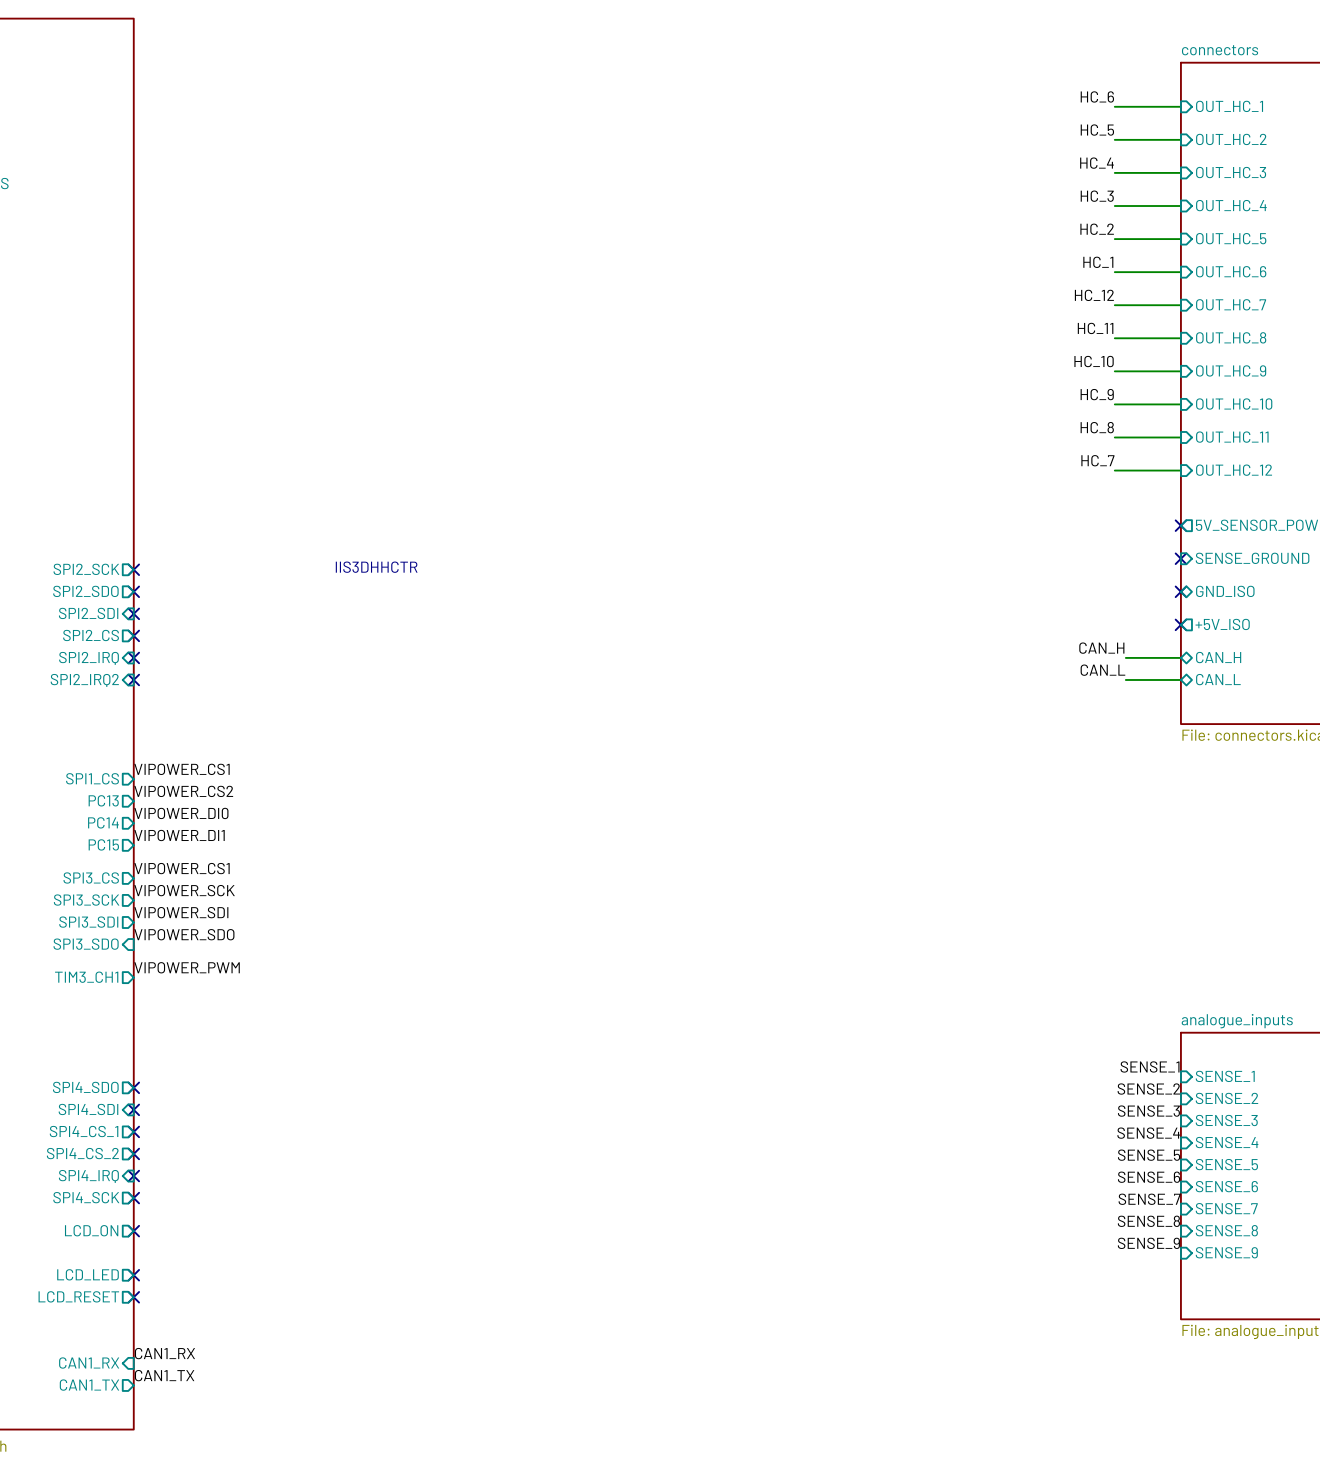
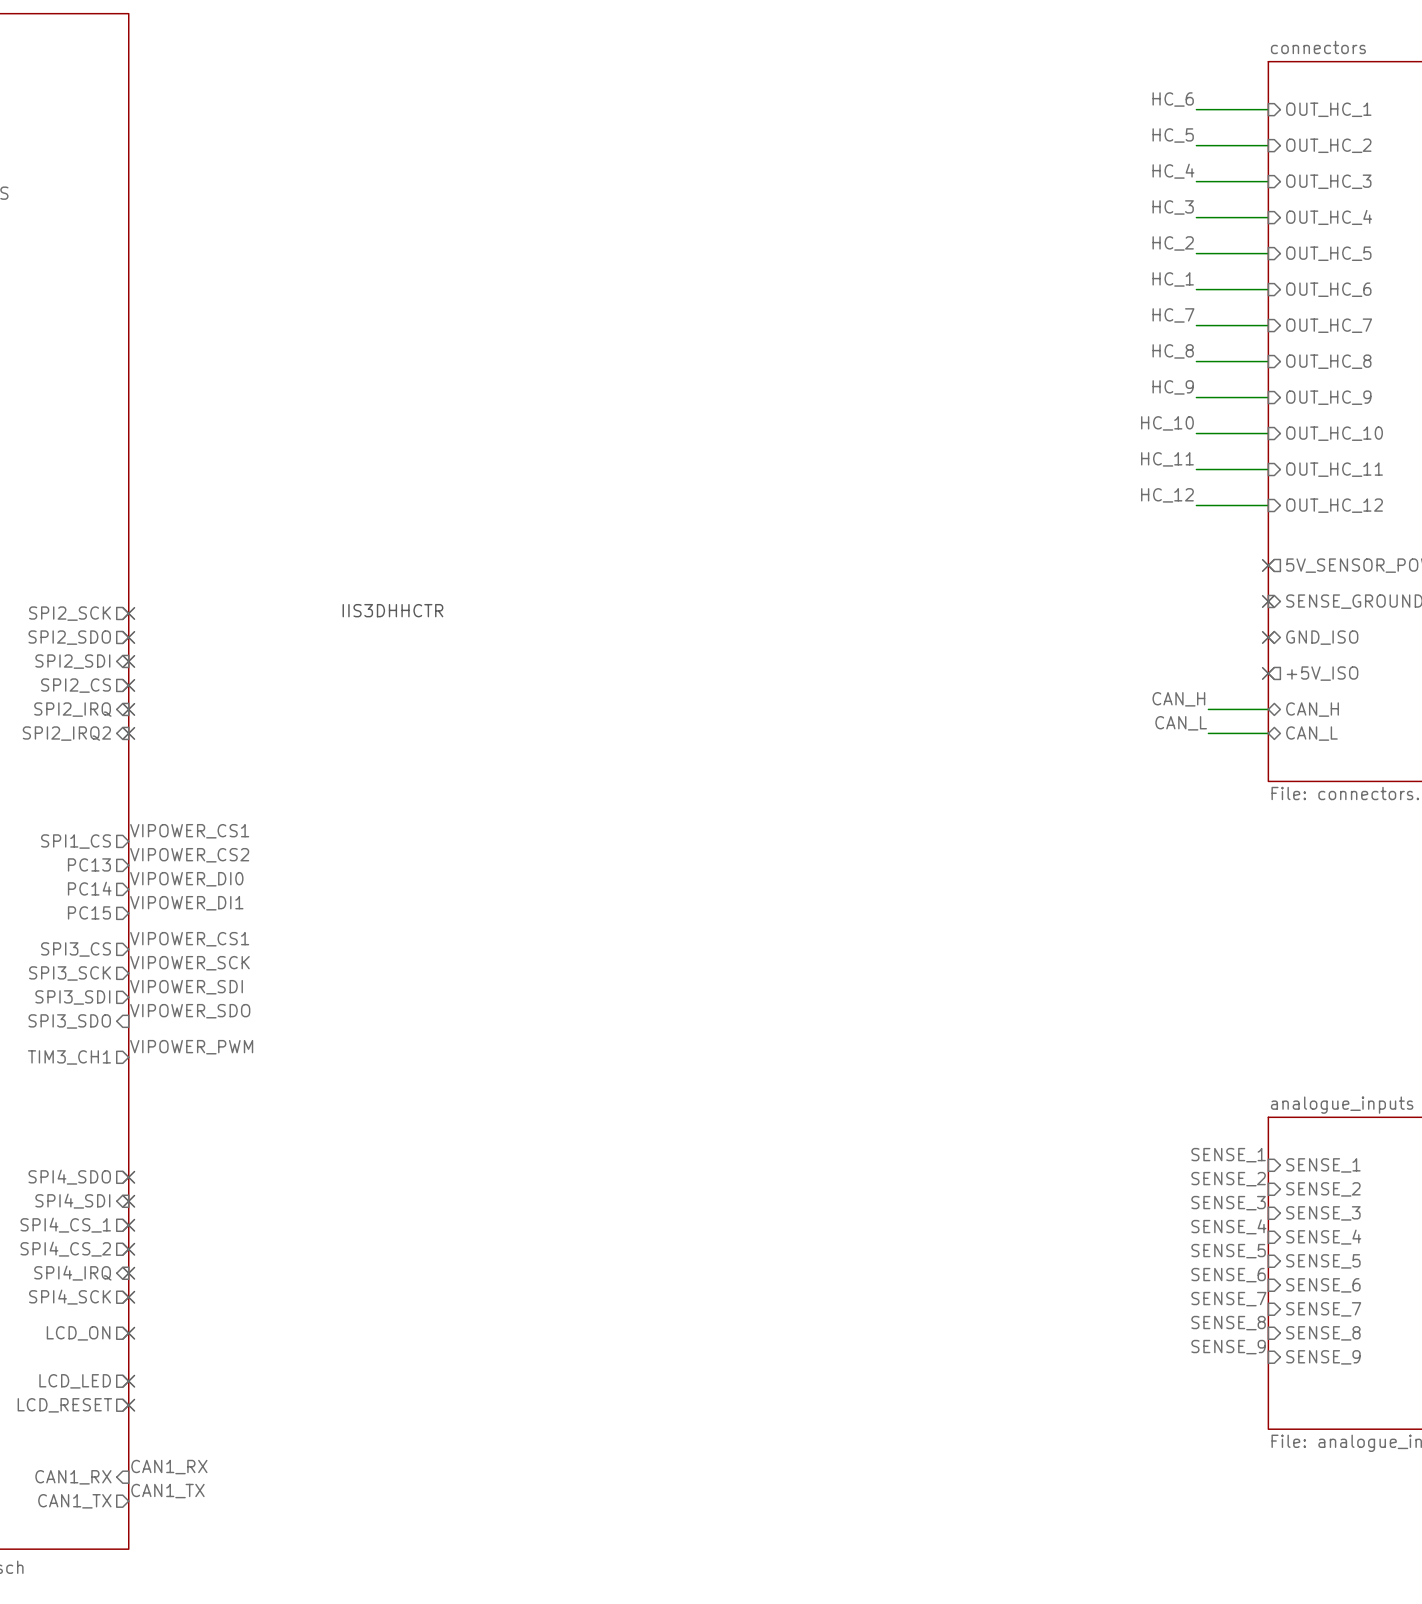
label: HC_12 (1094, 295) -> HC_7 (1173, 315)
label: HC_11 (1095, 328) -> HC_8 (1173, 351)
label: HC_10 (1094, 361) -> HC_9 (1173, 387)
label: HC_9 (1097, 394) -> HC_10 (1167, 423)
label: HC_8 (1097, 427) -> HC_11 (1167, 459)
label: HC_7 (1097, 460) -> HC_12 (1167, 495)

